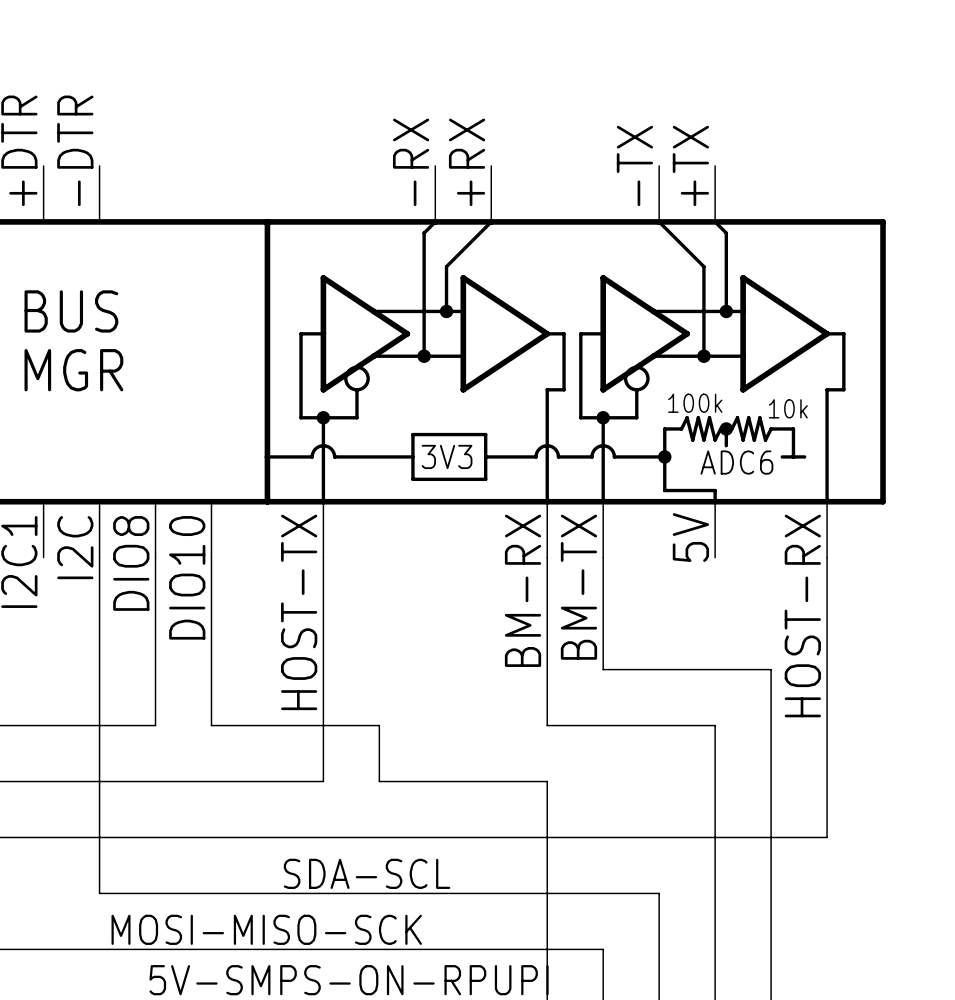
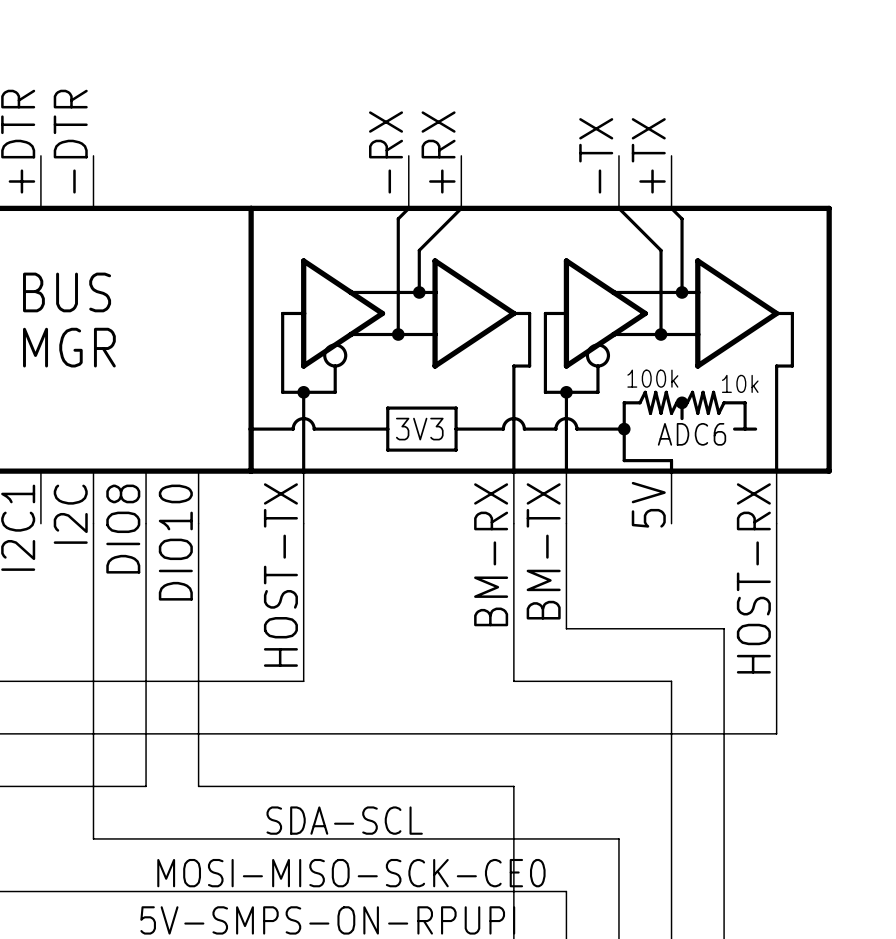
wire: (323, 781) (323, 725) (379, 725) (379, 781) -> (303, 733) (356, 733)
wire: (547, 781) (547, 837) (827, 837) (827, 781) -> (513, 733) (776, 733)
wire: (155, 837) (211, 837) -> (146, 786) (146, 681) (198, 681) (198, 786)
label: MOSI-MISO-SCK (266, 929) -> MOSI-MISO-SCK-CE0 (351, 873)

